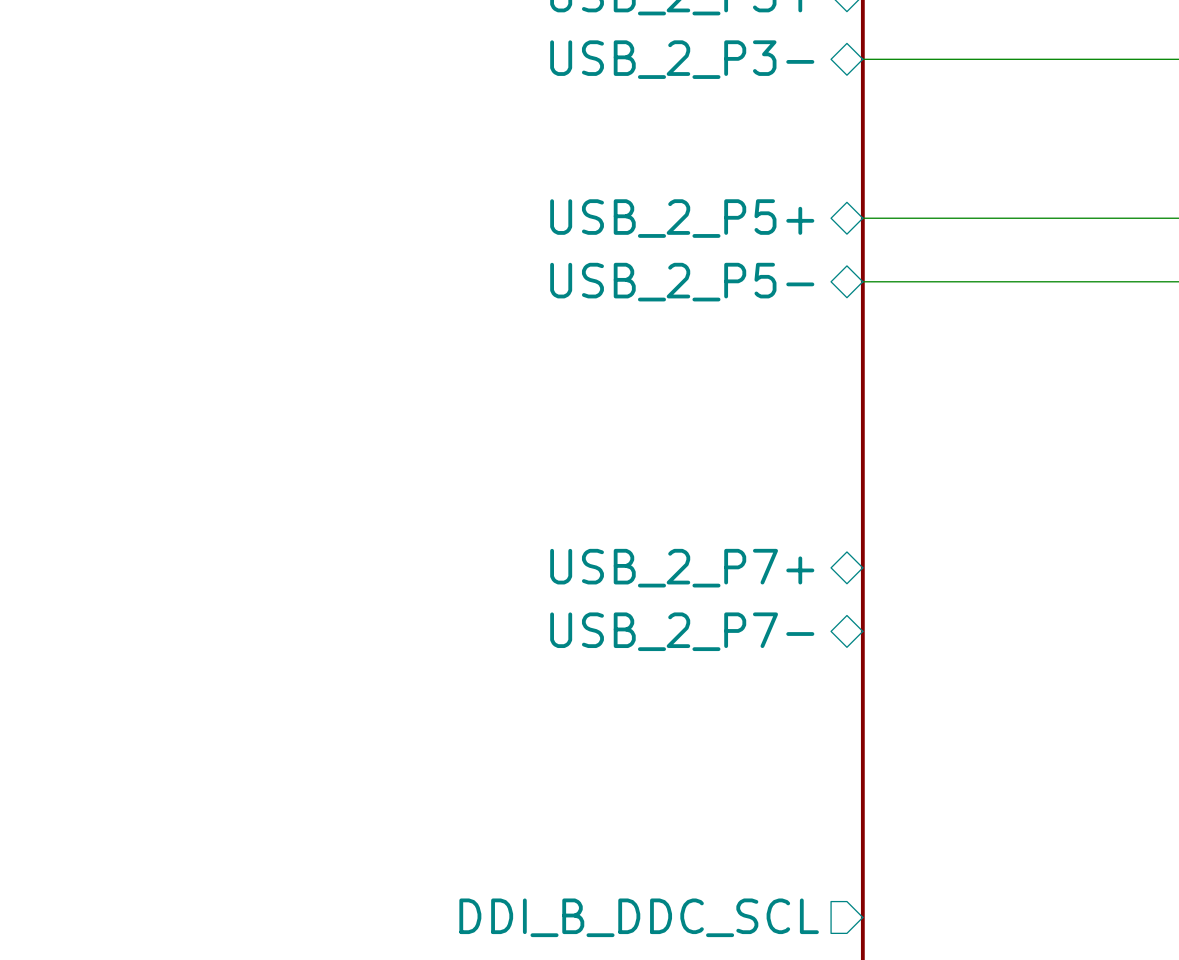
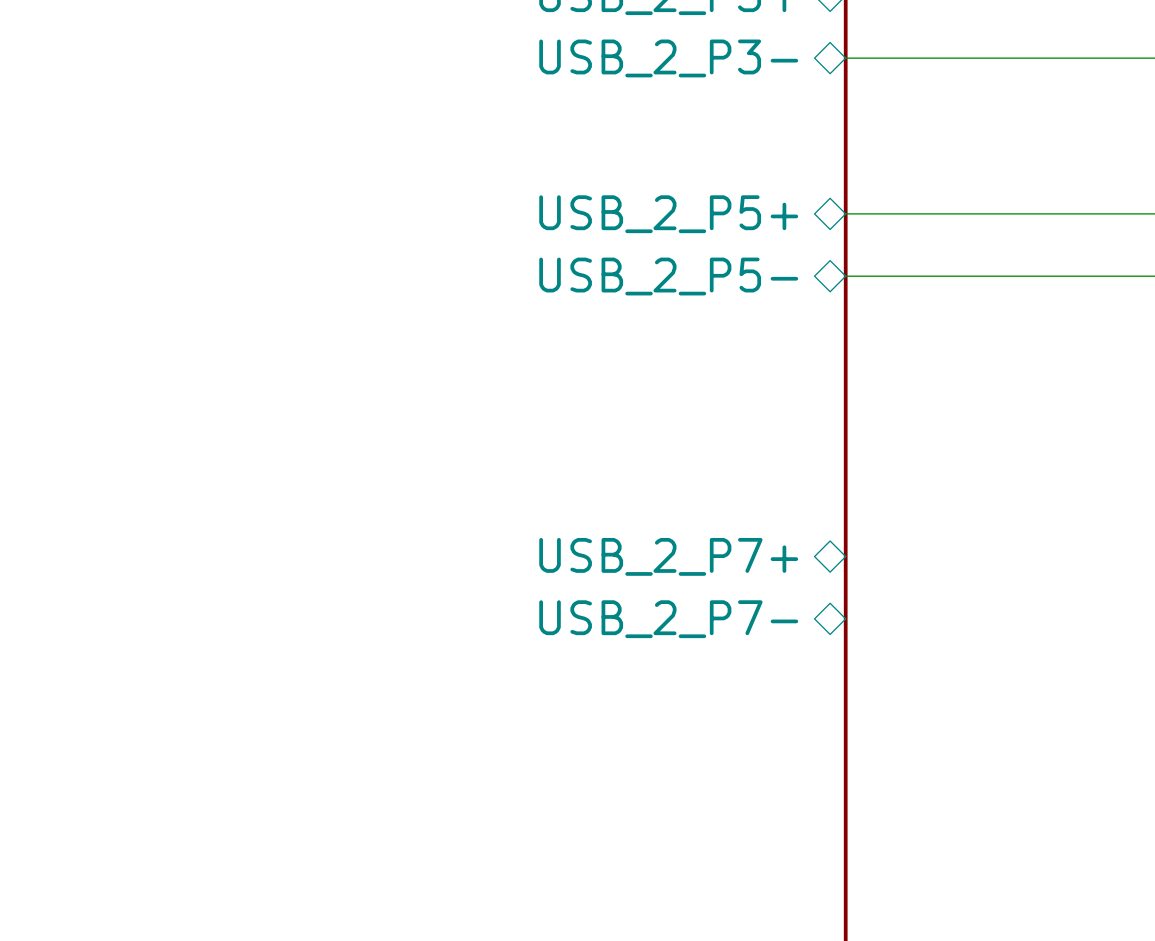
sheet pin: DDI_B_DDC_SCL (639, 917) -> none

